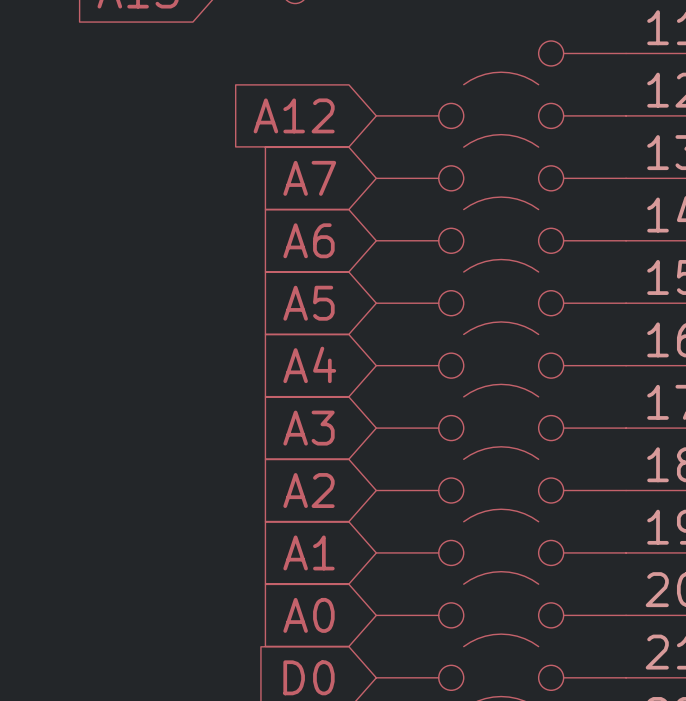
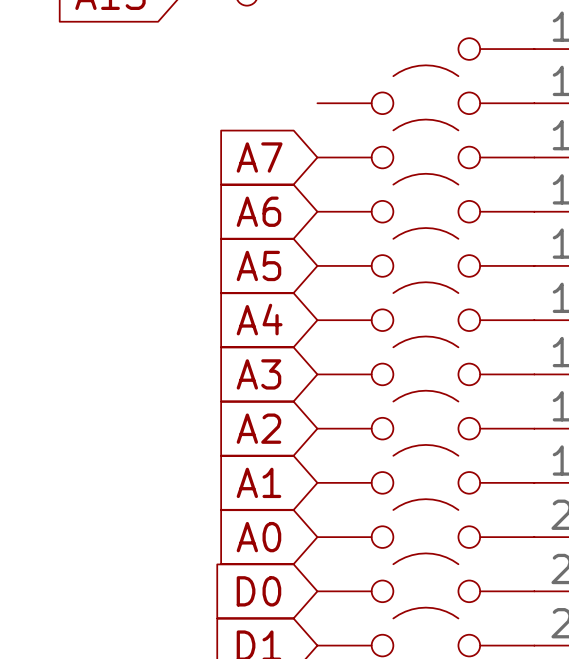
global label: A12 (294, 115) -> none

